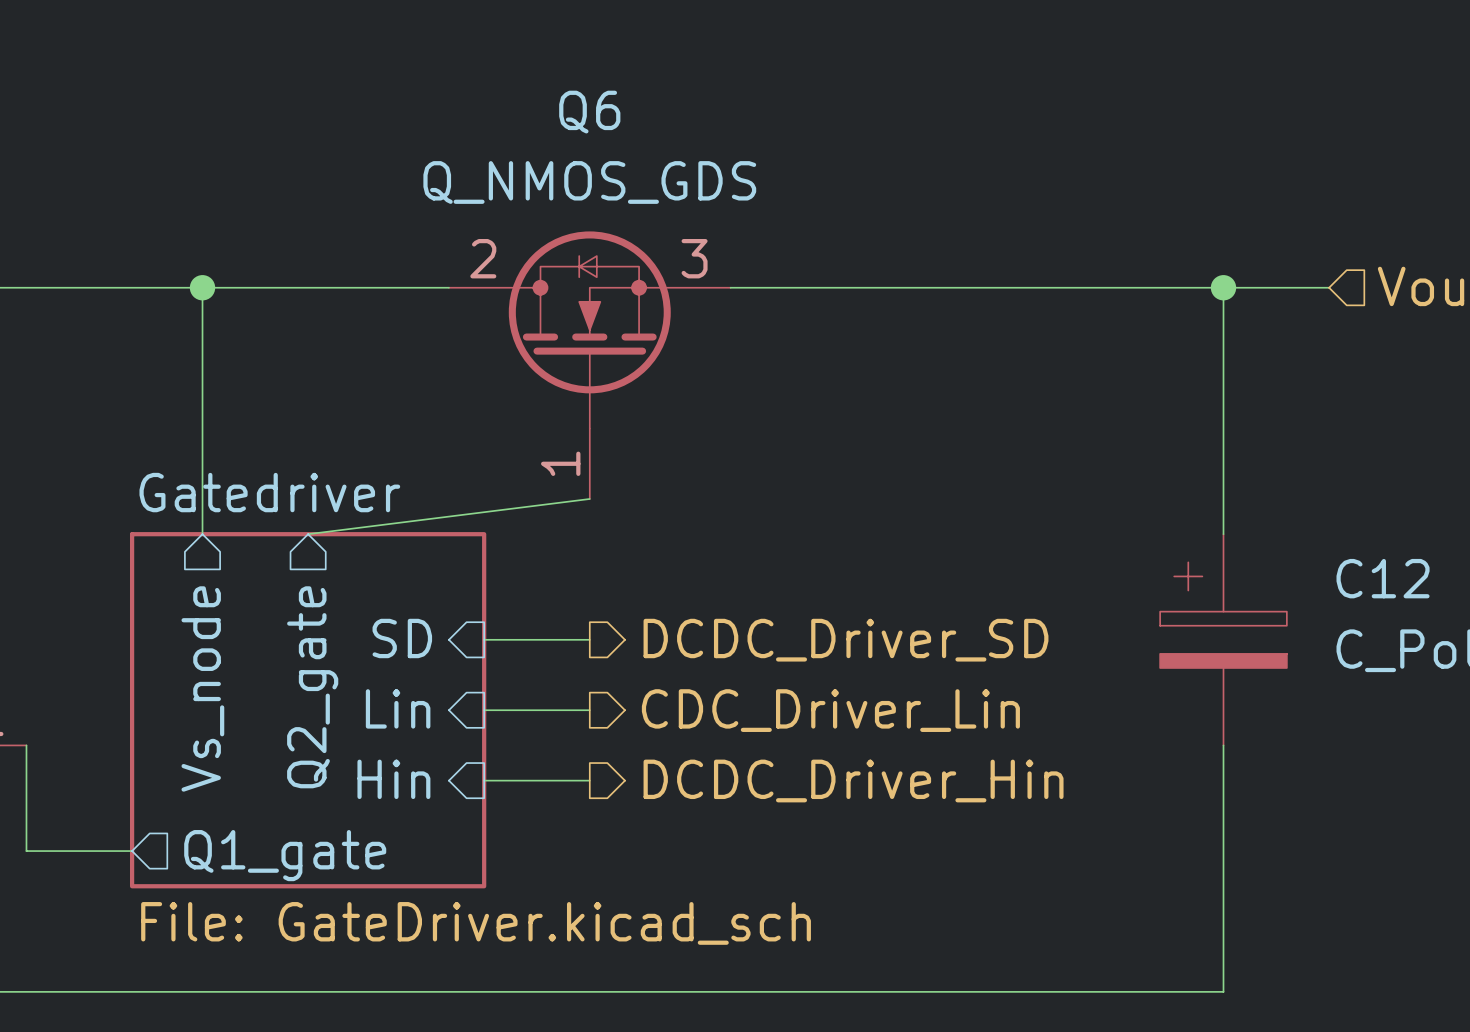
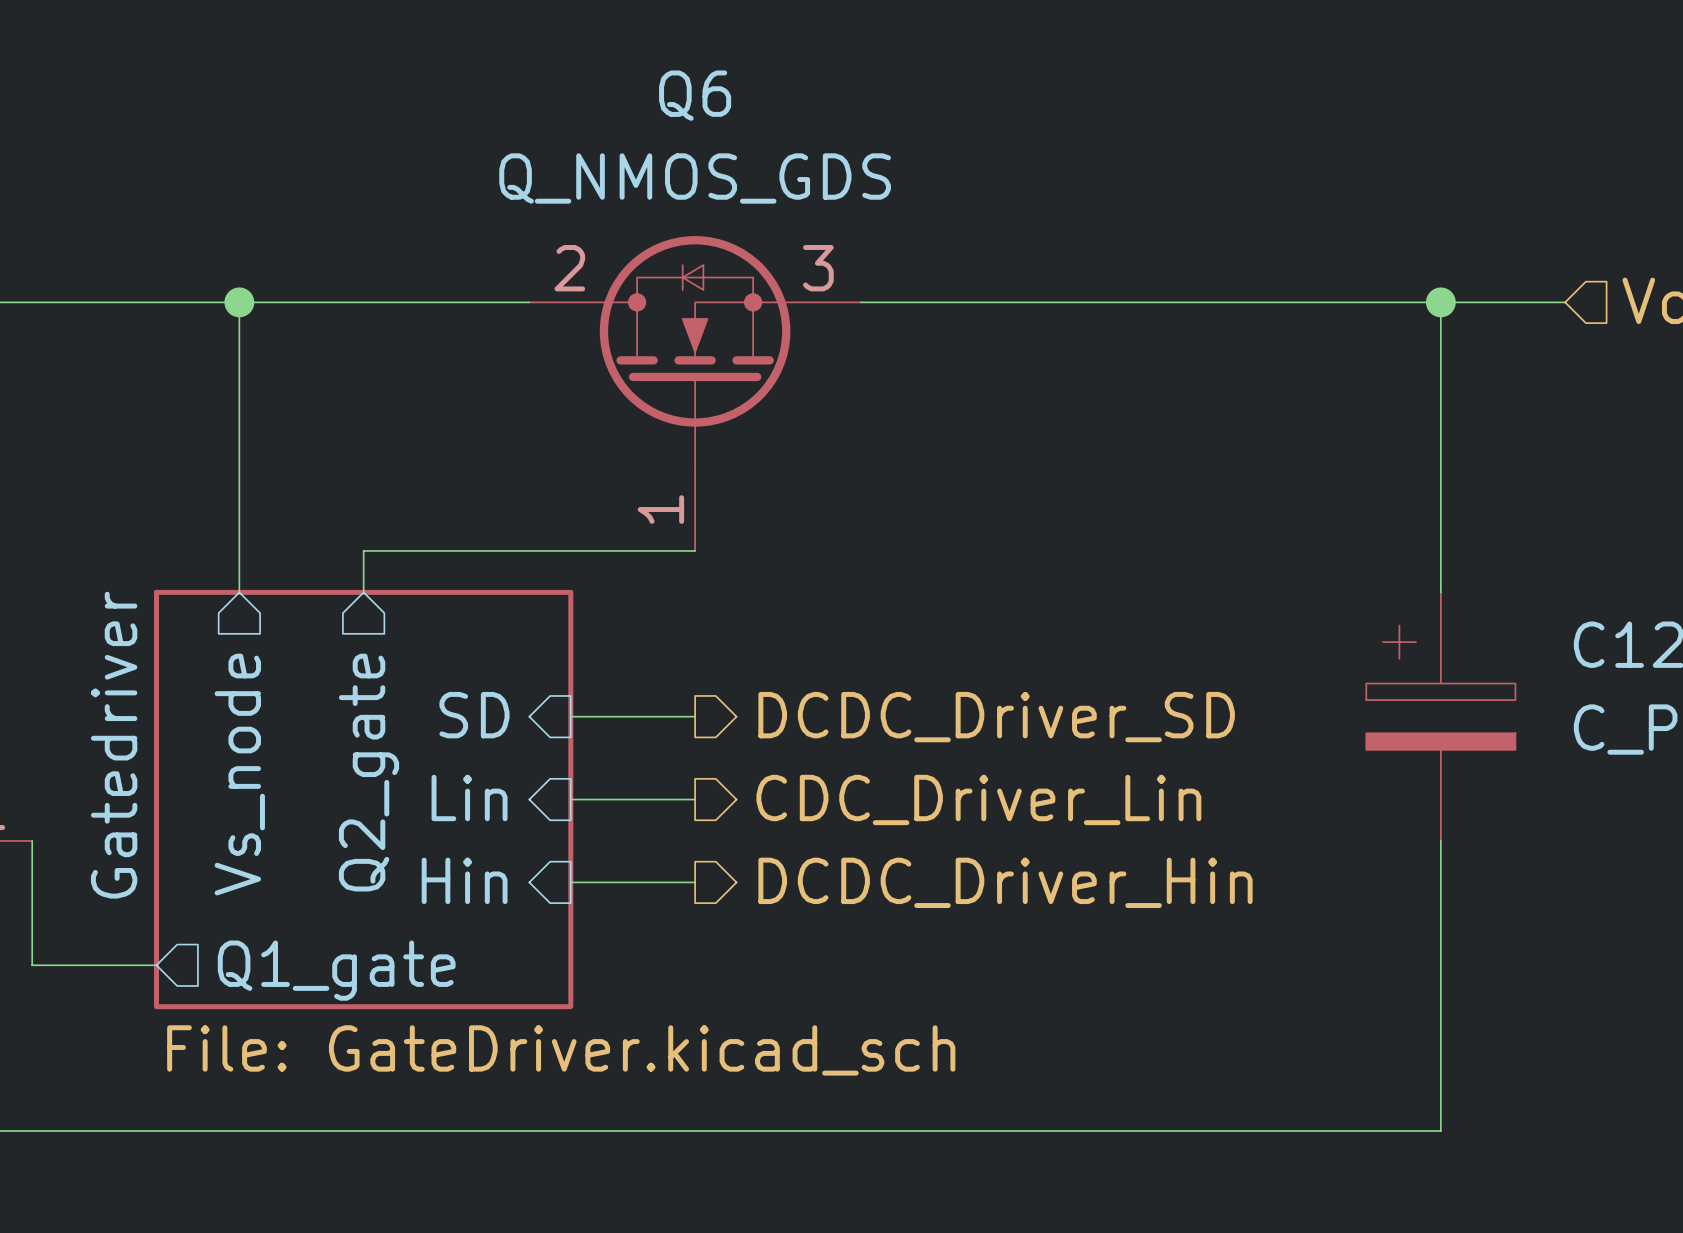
sheet Gatedriver name rotation: 0° (269, 492) -> 90° counterclockwise (114, 745)
wire: (589, 498) (308, 534) -> (695, 550) (363, 550) (363, 592)

